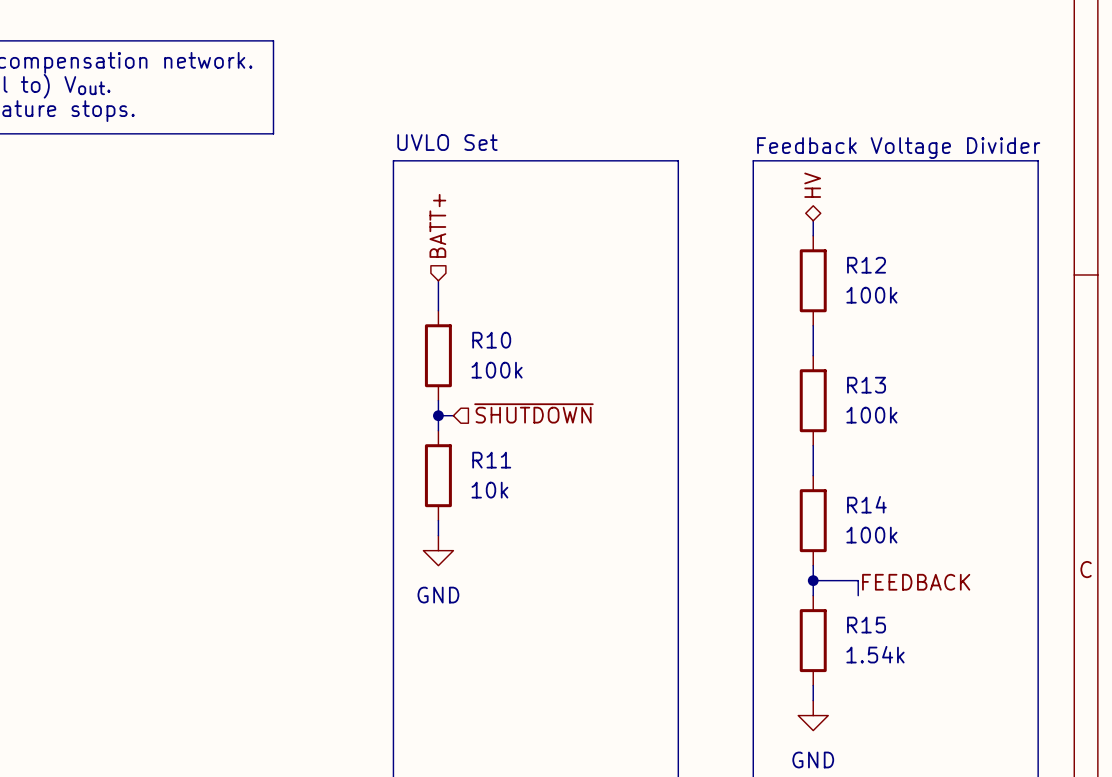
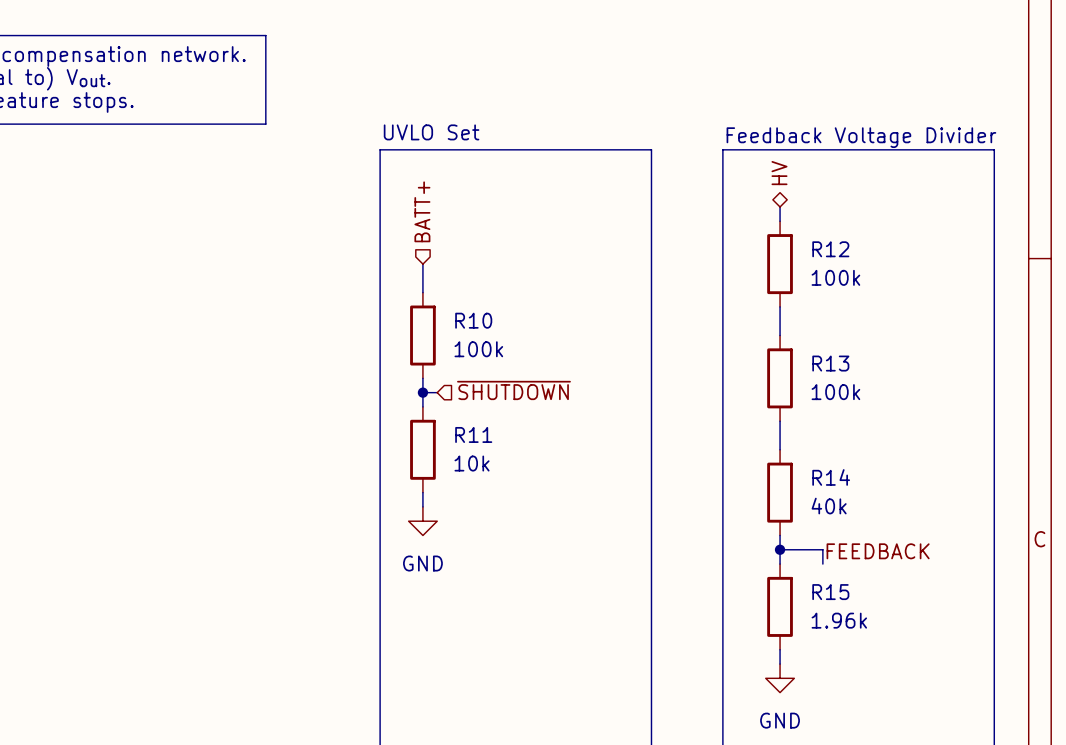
R14 value: 100k (871, 535) -> 40k (829, 506)
R15 value: 1.54k (875, 654) -> 1.96k (839, 620)

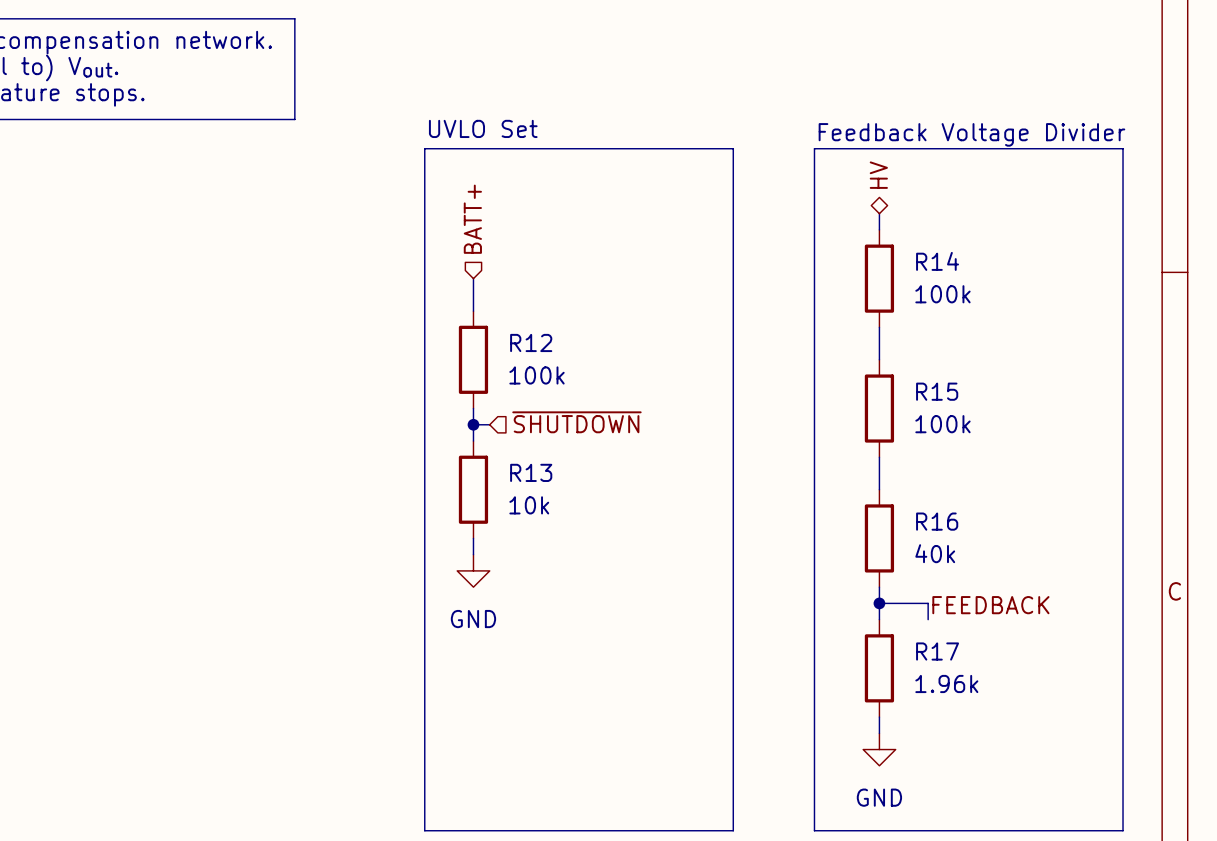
R12 name: R12 (830, 249) -> R14 (937, 261)
R10 name: R10 (473, 320) -> R12 (531, 342)
R13 name: R13 (830, 363) -> R15 (937, 391)
R11 name: R11 (473, 434) -> R13 (531, 472)
R14 name: R14 (831, 477) -> R16 (937, 521)
R15 name: R15 (830, 592) -> R17 (937, 651)

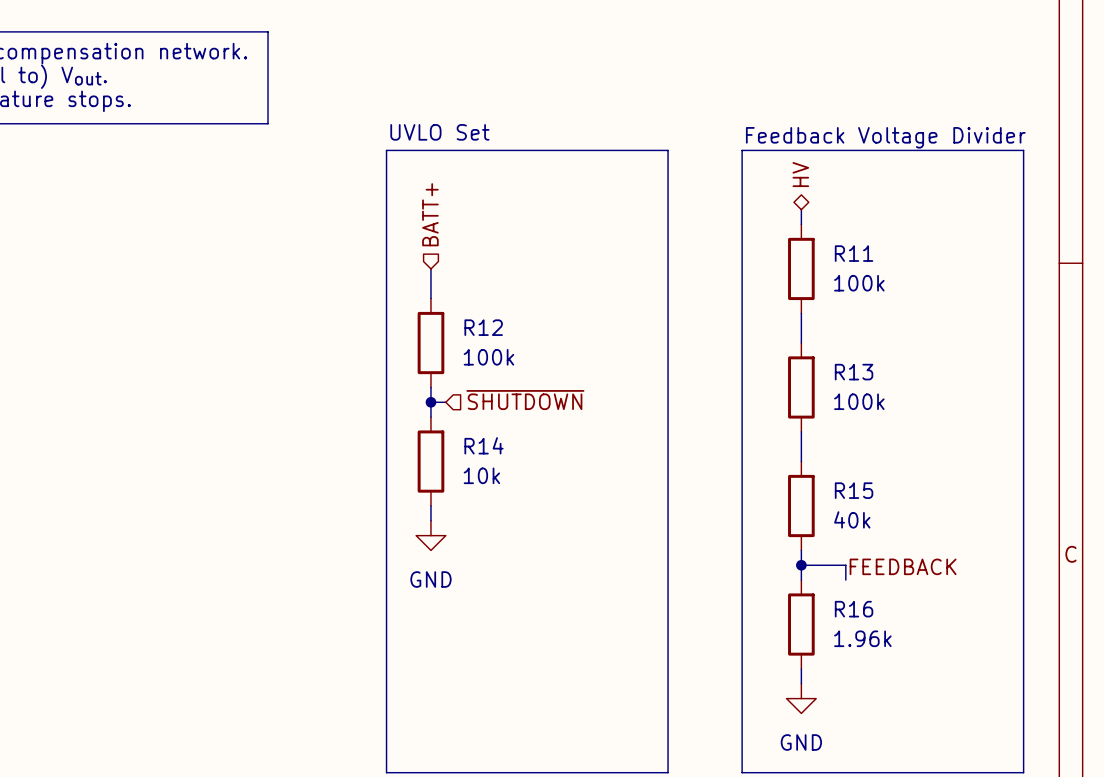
R14 name: R14 (937, 261) -> R11 (854, 253)
R15 name: R15 (937, 391) -> R13 (854, 372)
R13 name: R13 (531, 472) -> R14 (484, 445)
R16 name: R16 (937, 521) -> R15 (854, 490)
R17 name: R17 (937, 651) -> R16 (854, 609)

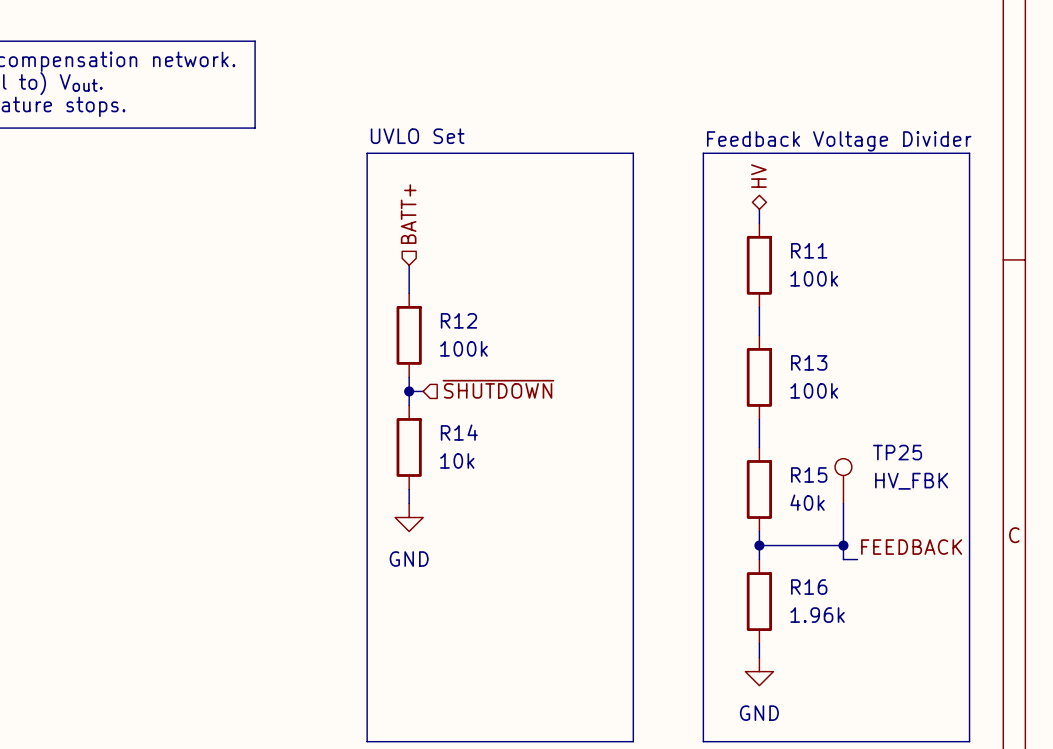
TP25: none -> HV_FBK (843, 481)
wire: none -> (843, 503) (843, 559) (857, 559)
wire: (845, 565) (845, 580) -> (801, 545) (843, 545)
junction: none -> (843, 545)
label position: FEEDBACK (903, 566) -> FEEDBACK (911, 547)

